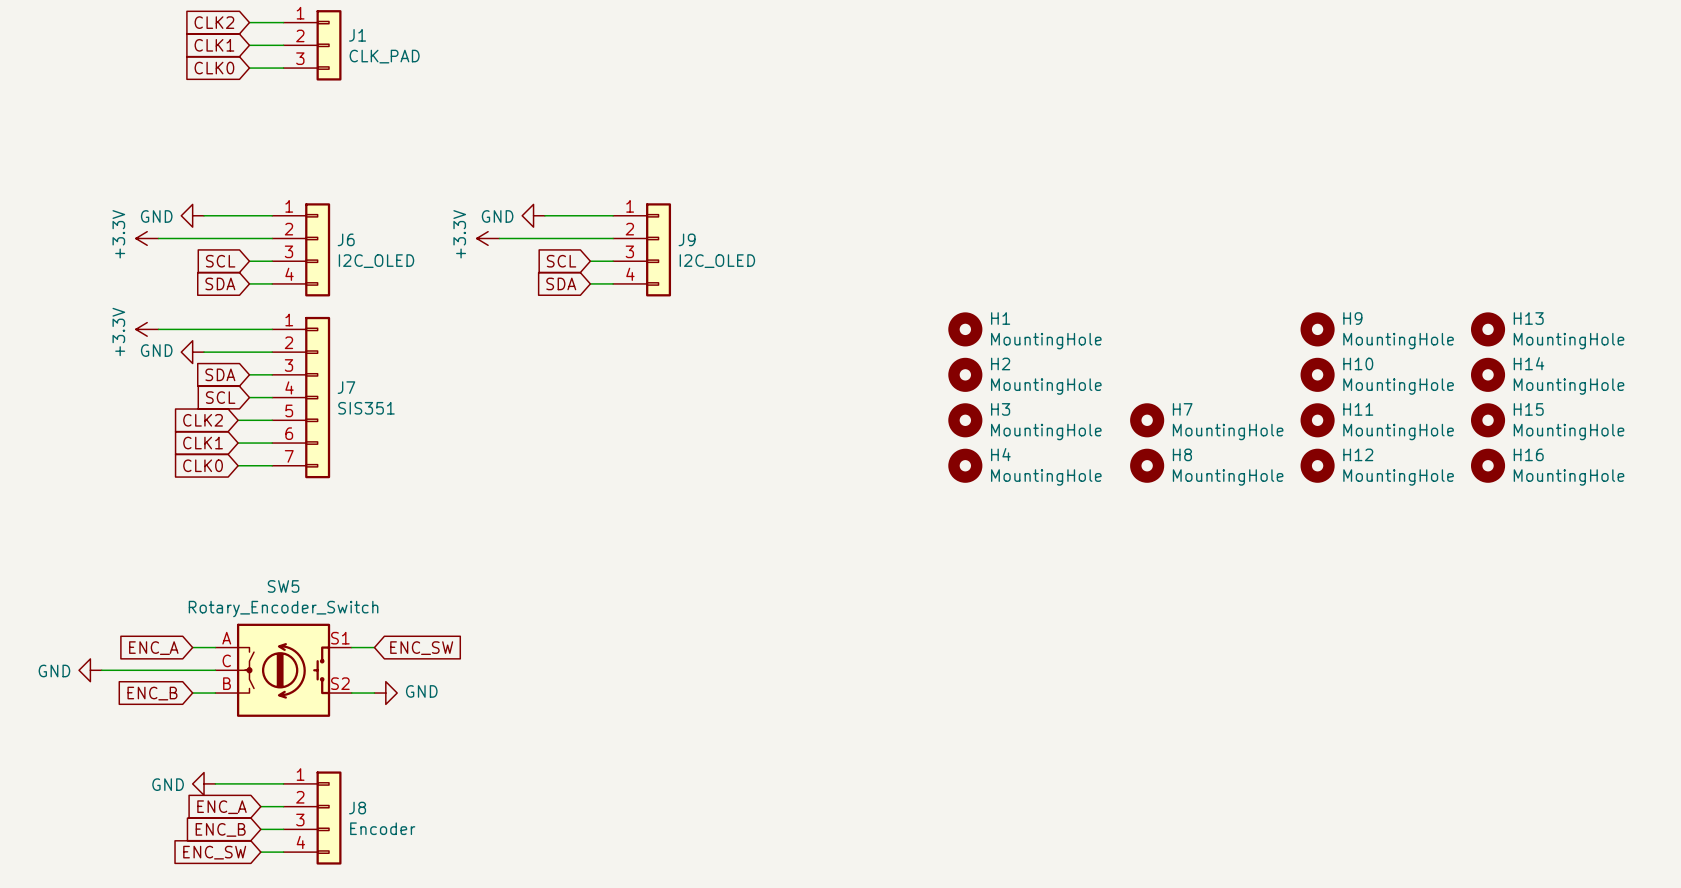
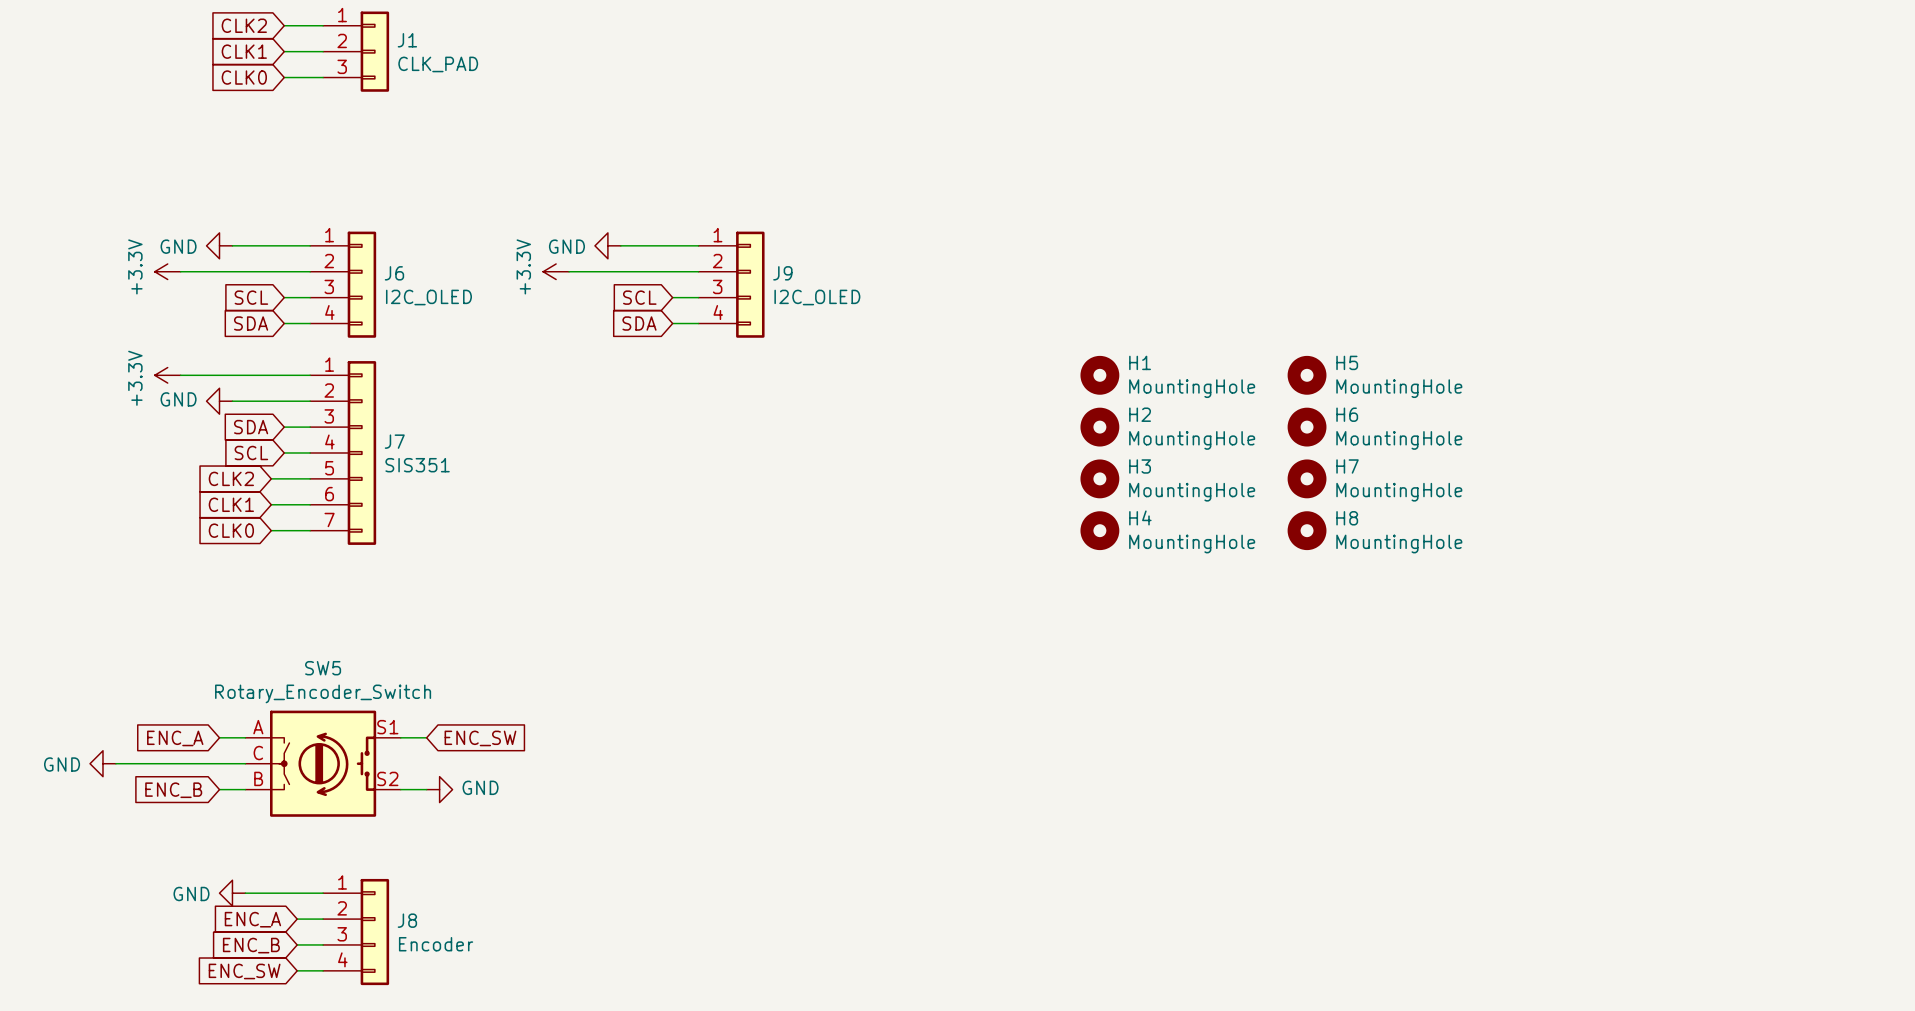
H5: none -> MountingHole (1307, 375)
H9: MountingHole (1317, 329) -> none
H13: MountingHole (1488, 329) -> none
H6: none -> MountingHole (1307, 427)
H10: MountingHole (1317, 374) -> none
H14: MountingHole (1488, 374) -> none
H11: MountingHole (1317, 420) -> none
H15: MountingHole (1488, 420) -> none
H12: MountingHole (1317, 465) -> none
H16: MountingHole (1488, 465) -> none

